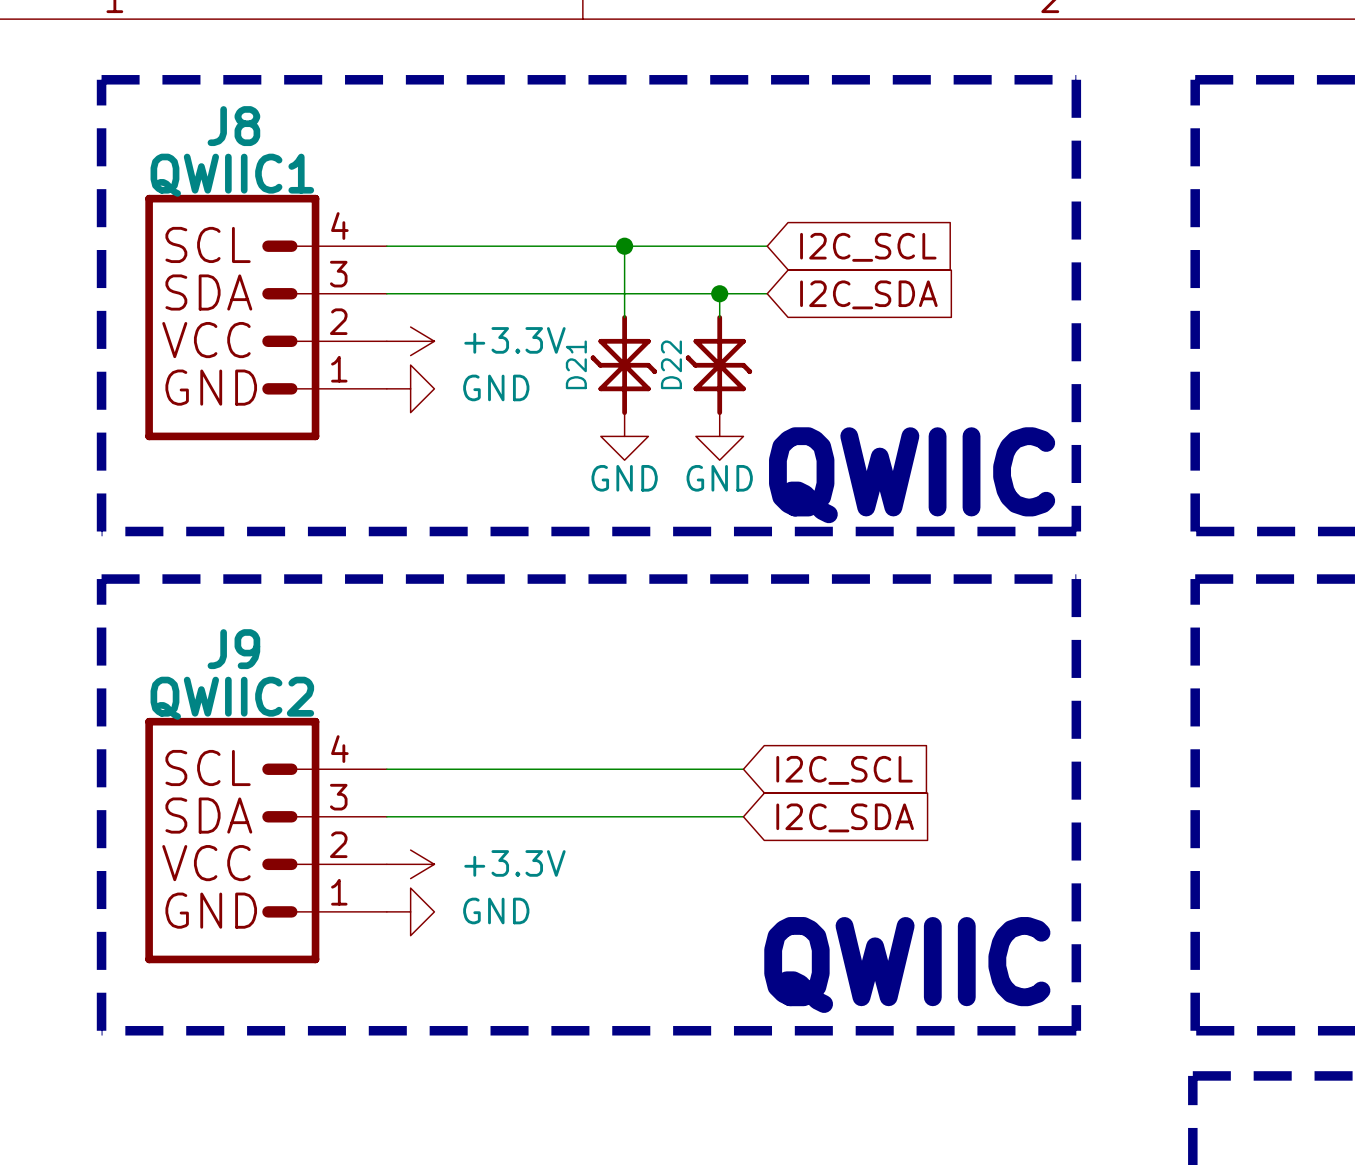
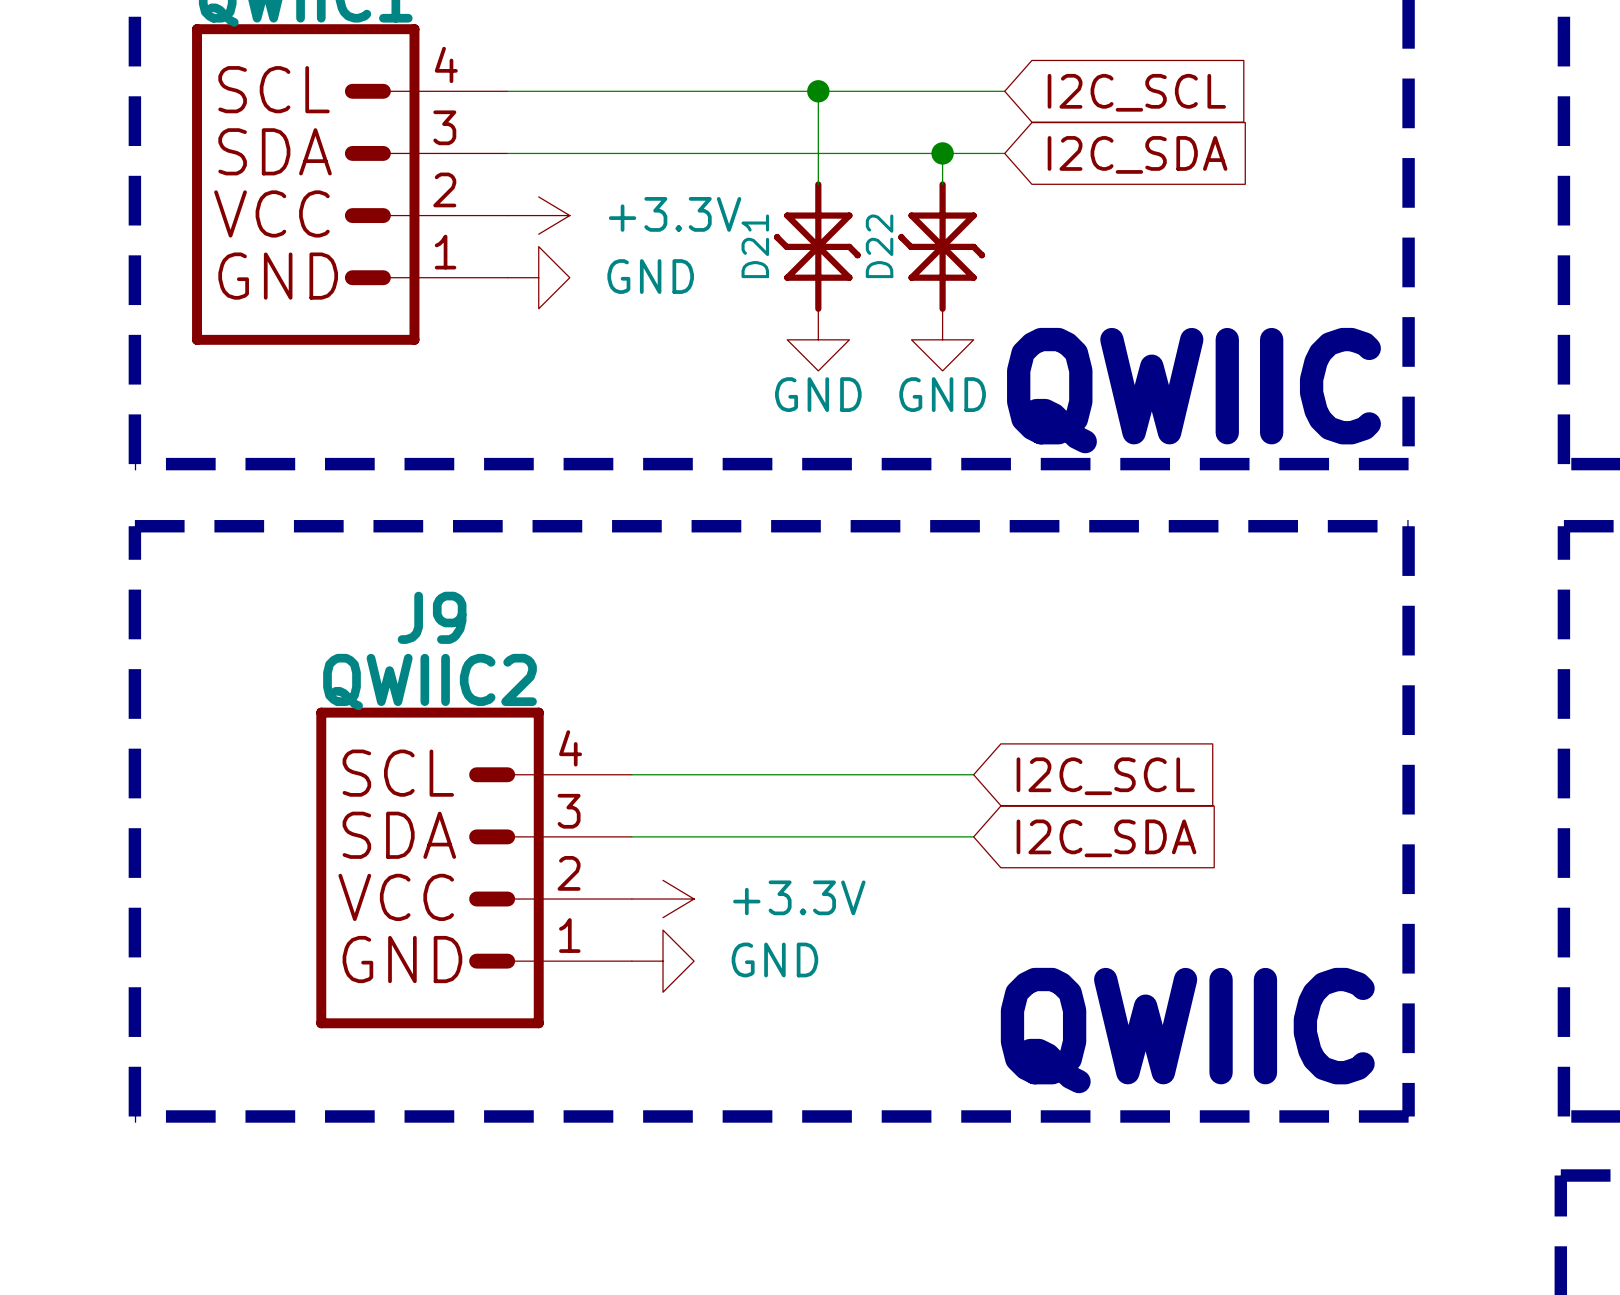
J9 position: (266, 840) -> (474, 867)
power symbol position: +3.3V (410, 864) -> +3.3V (663, 899)
power symbol position: GND (410, 911) -> GND (663, 961)

